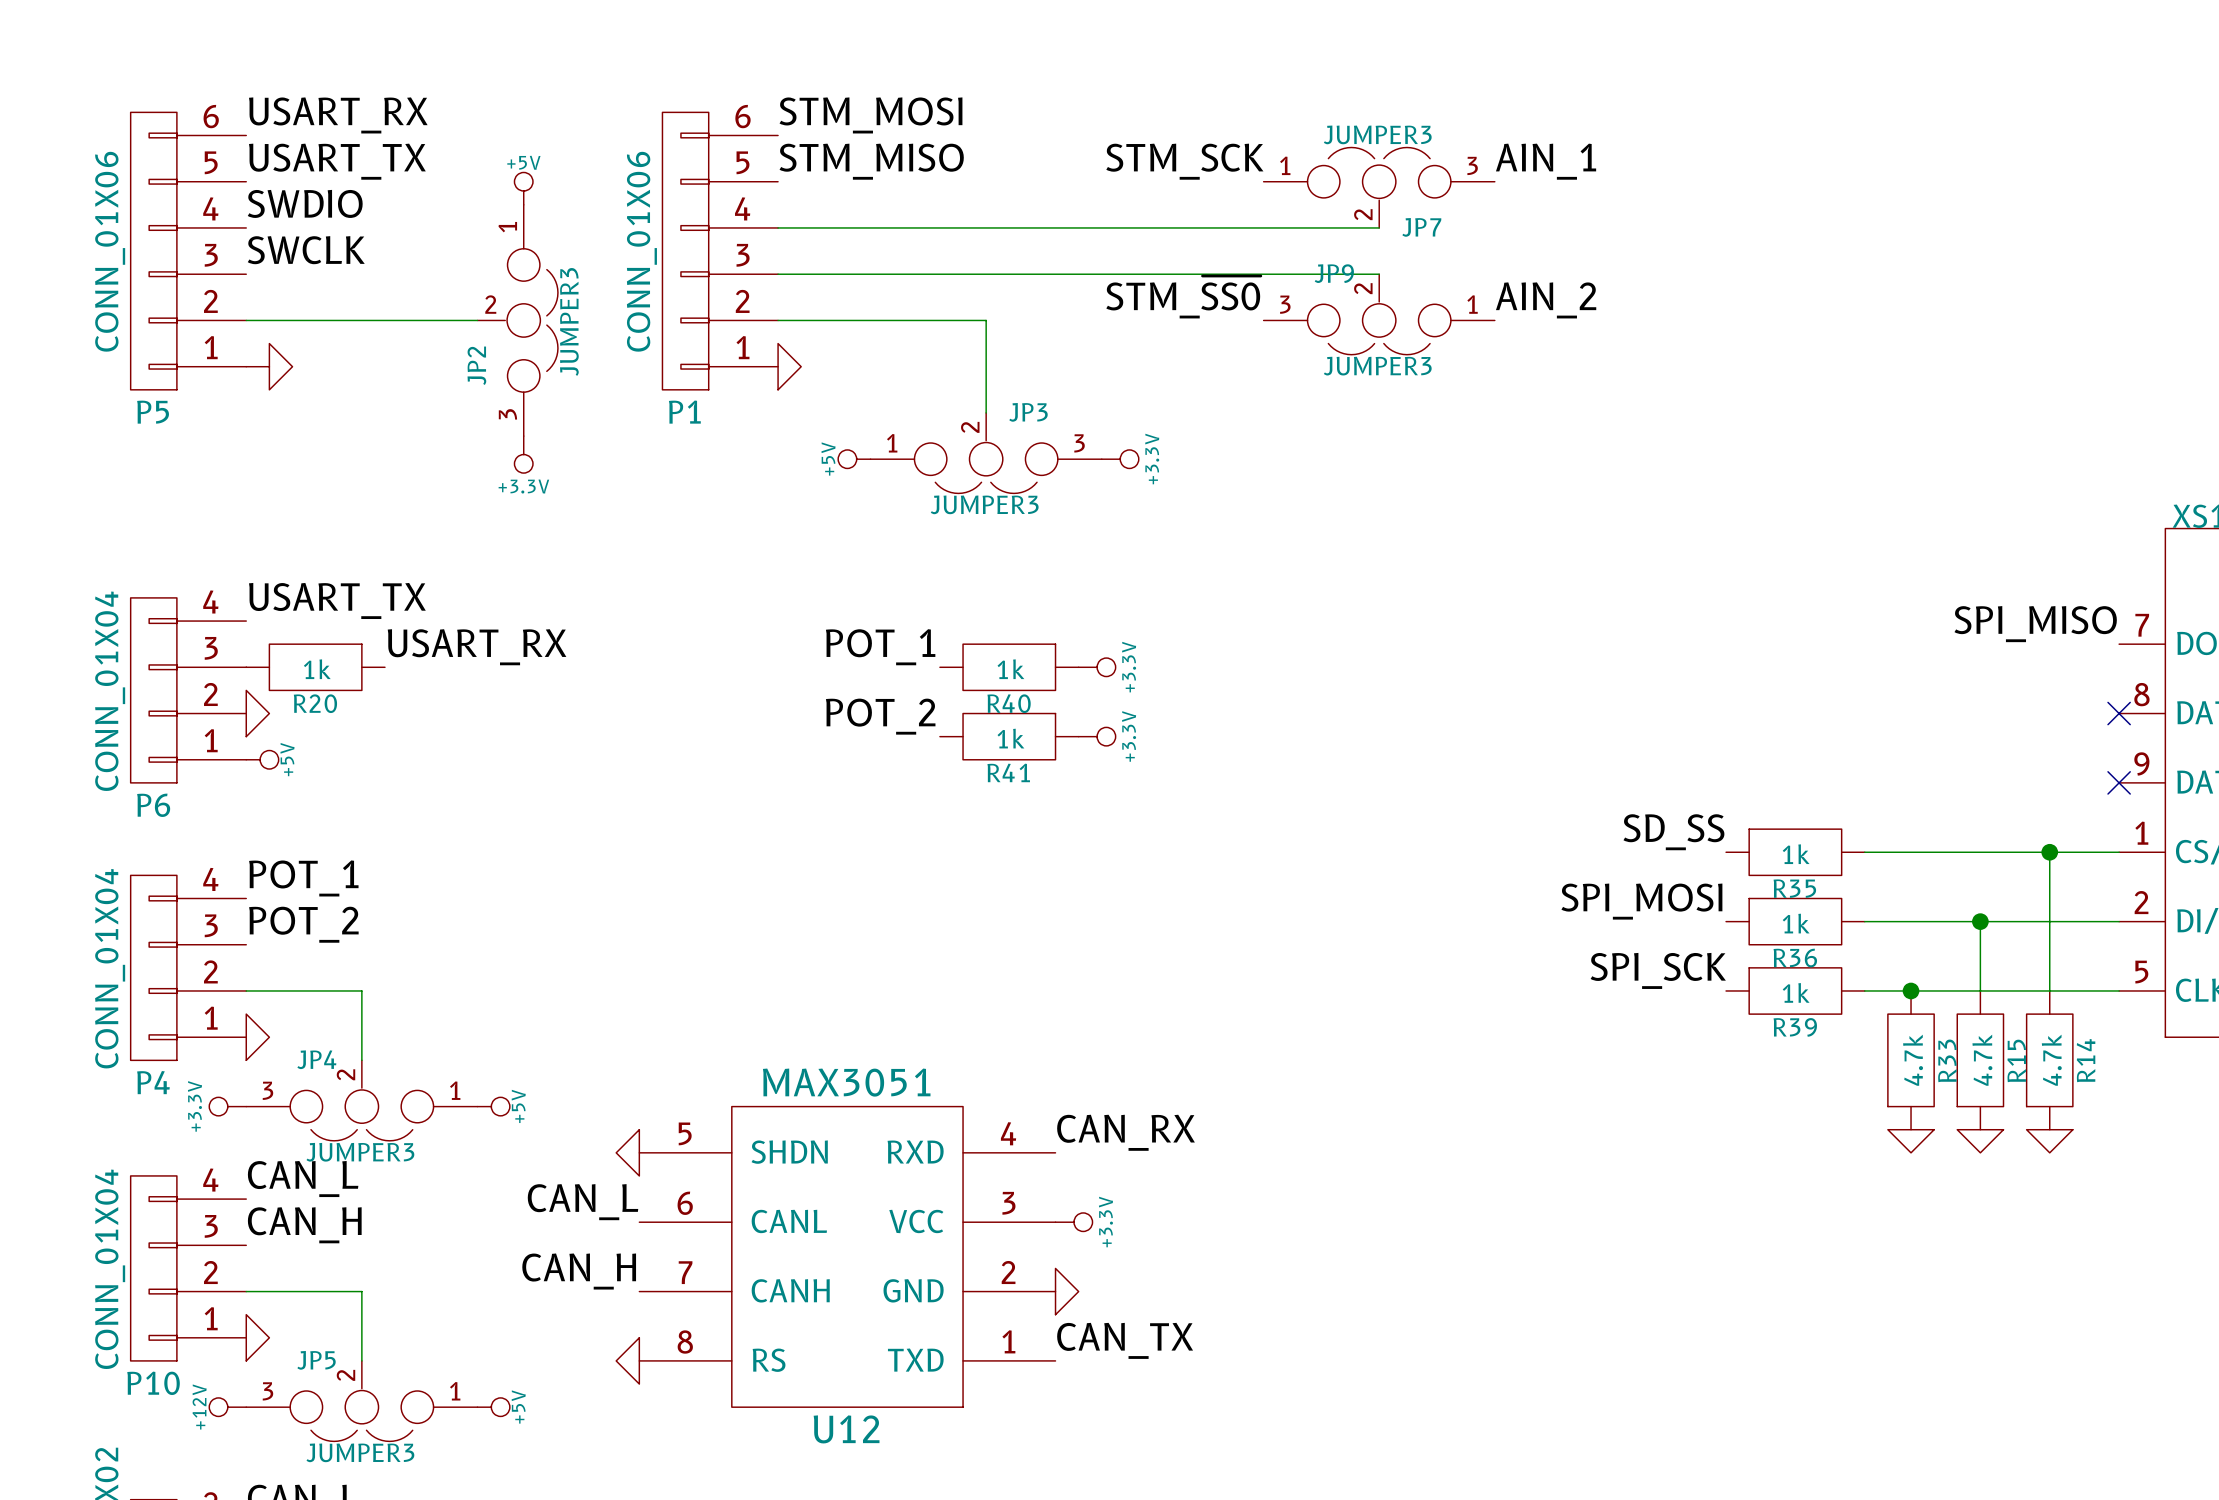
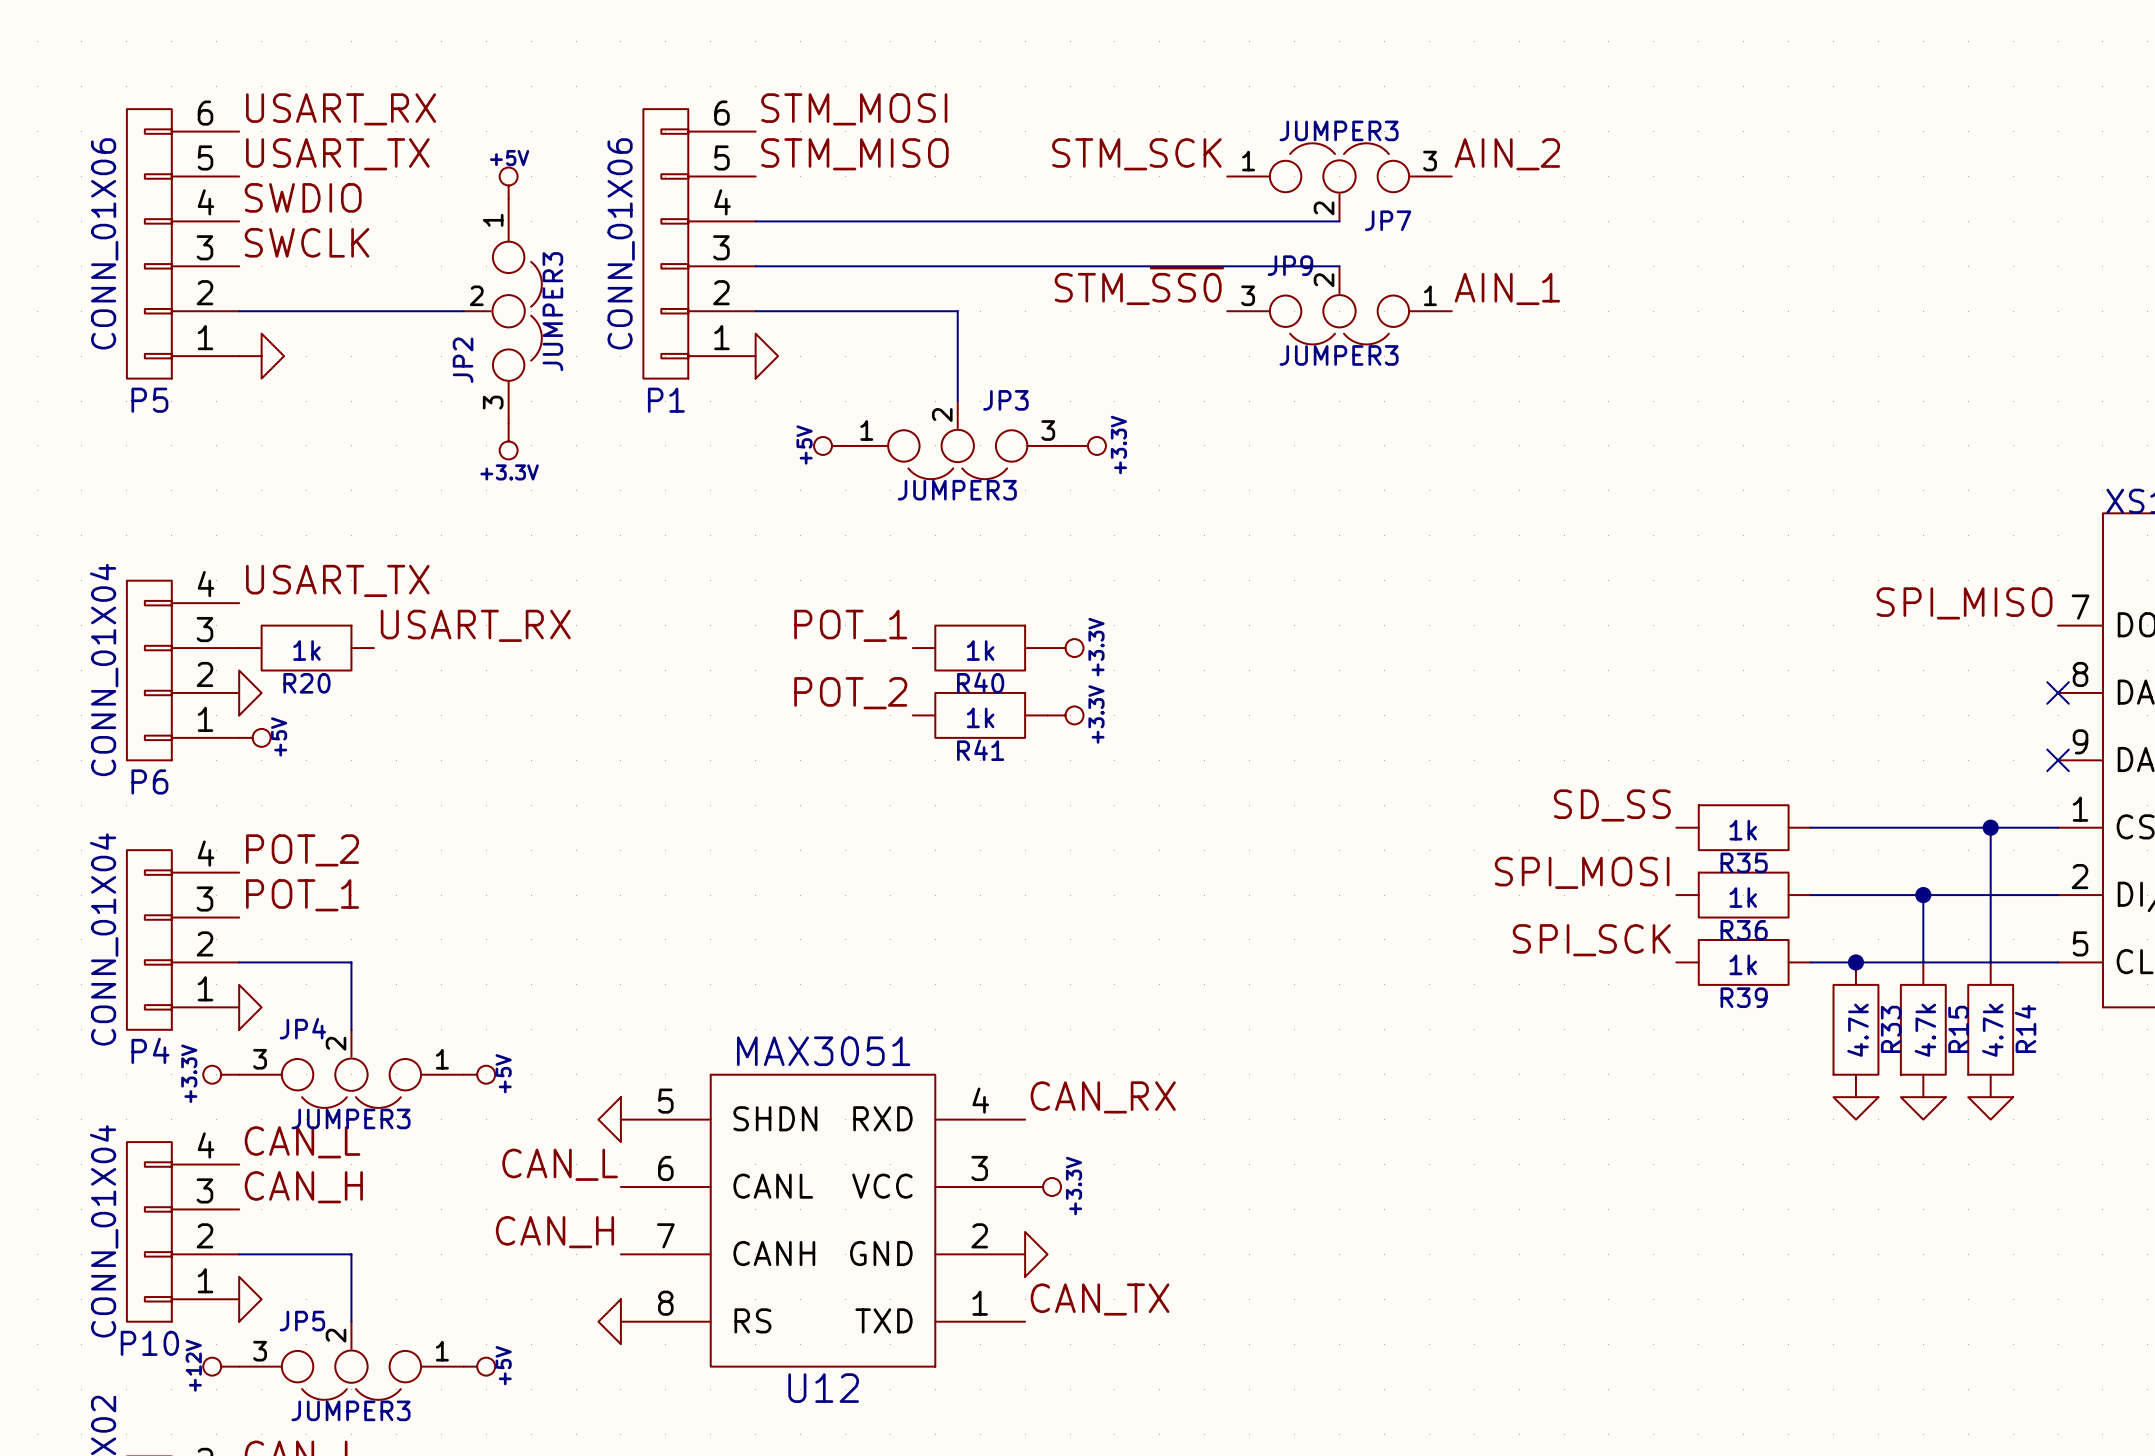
label: AIN_1 (1546, 161) -> AIN_2 (1507, 154)
label: AIN_2 (1546, 300) -> AIN_1 (1507, 289)
label: POT_1 (303, 878) -> POT_2 (302, 850)
label: POT_2 (303, 924) -> POT_1 (302, 895)

